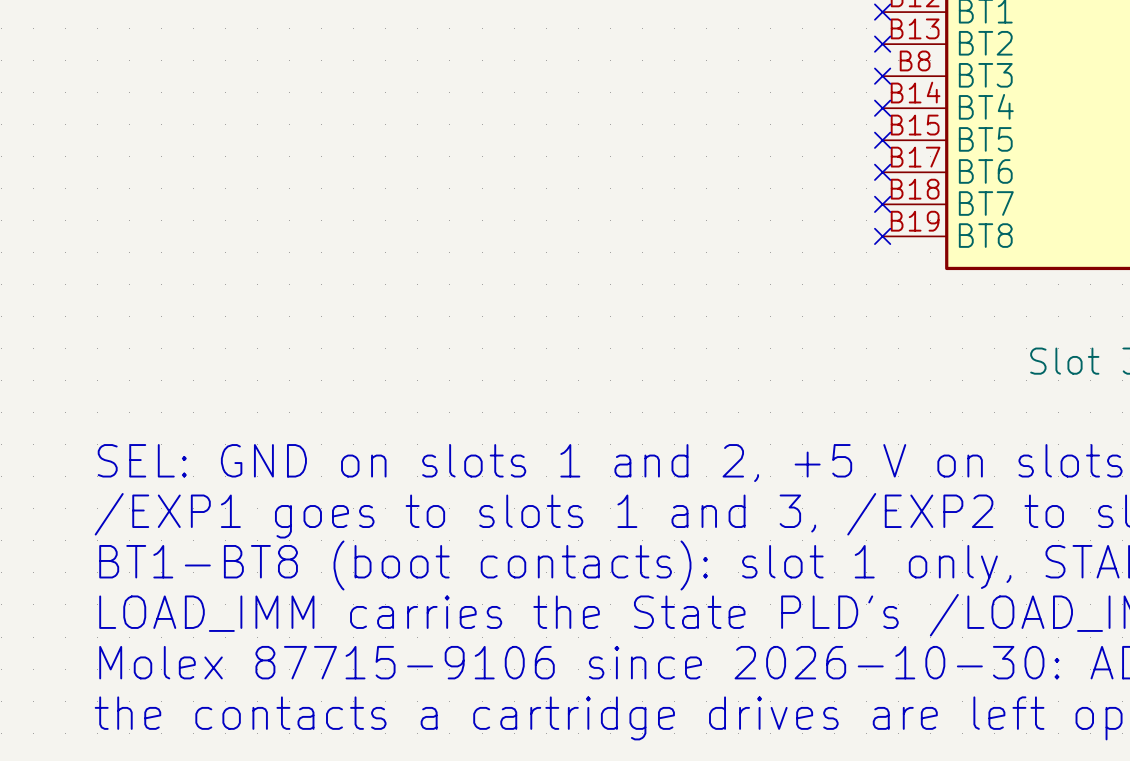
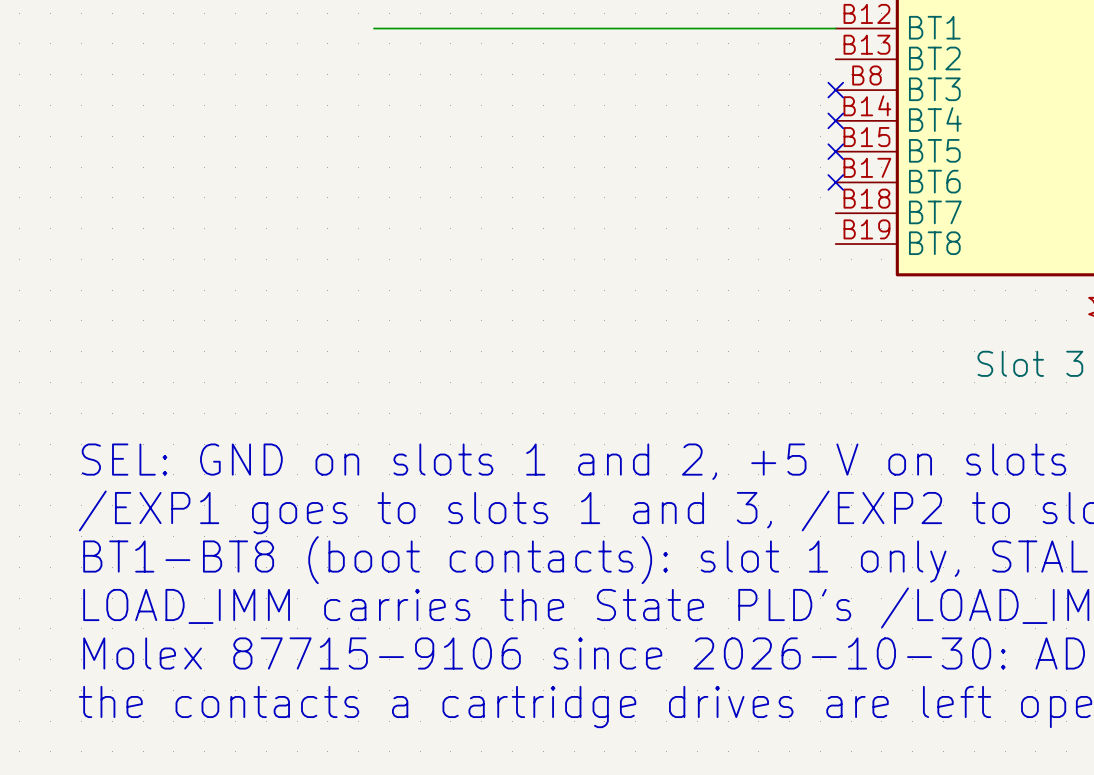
wire: none -> (373, 28) (835, 28)
no-connect mark: (882, 12) -> none
no-connect mark: (882, 44) -> none
no-connect mark: (882, 204) -> none
no-connect mark: (882, 236) -> none

